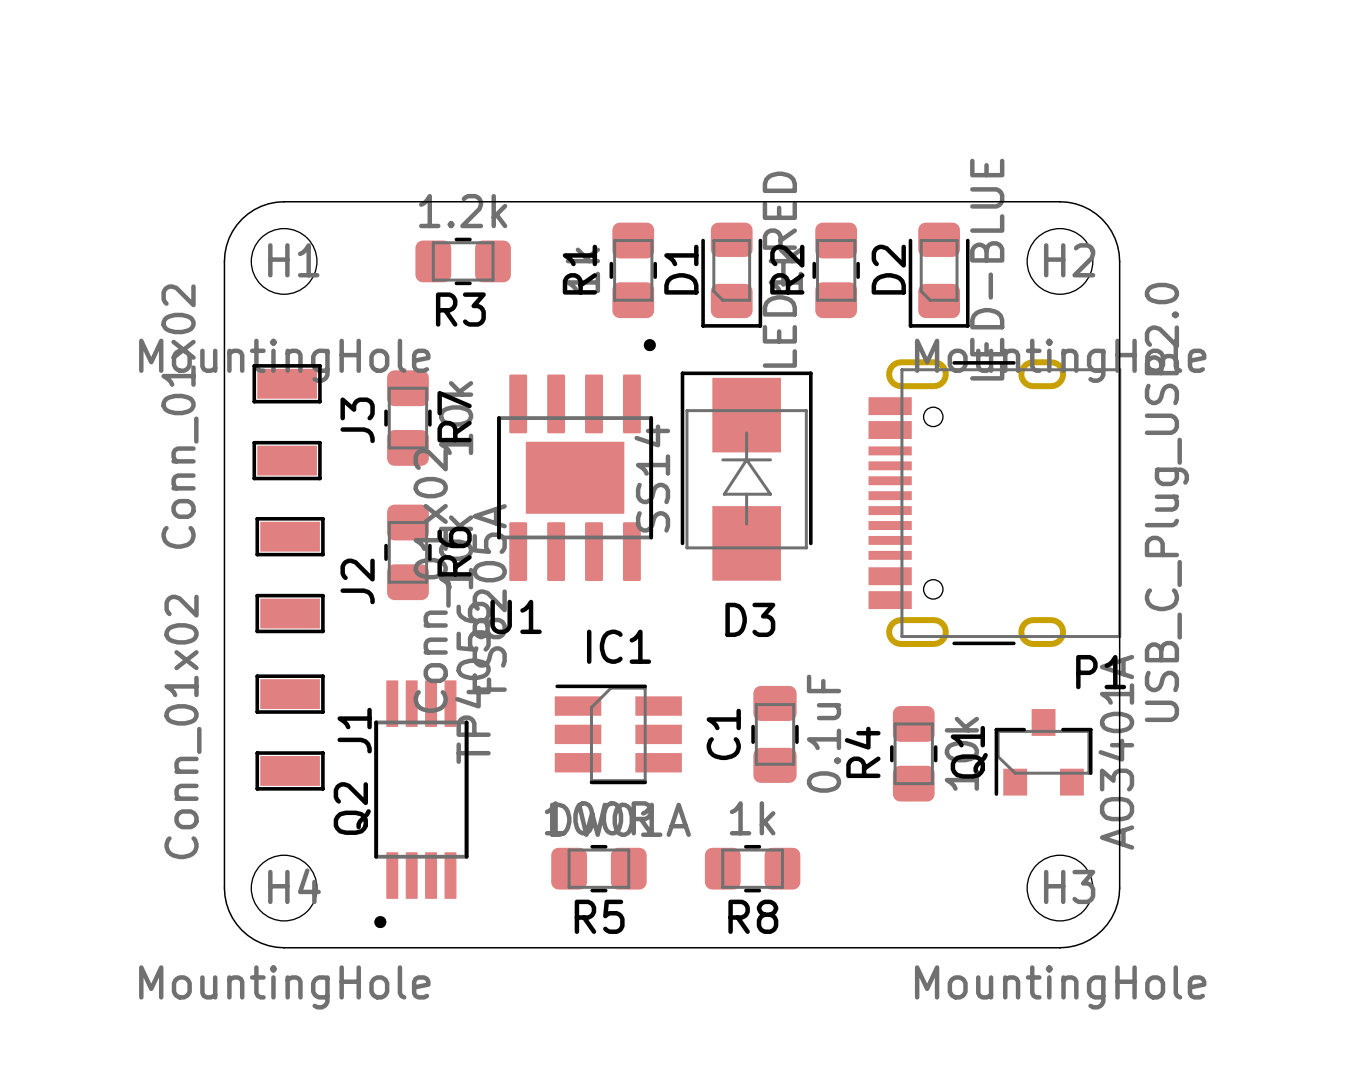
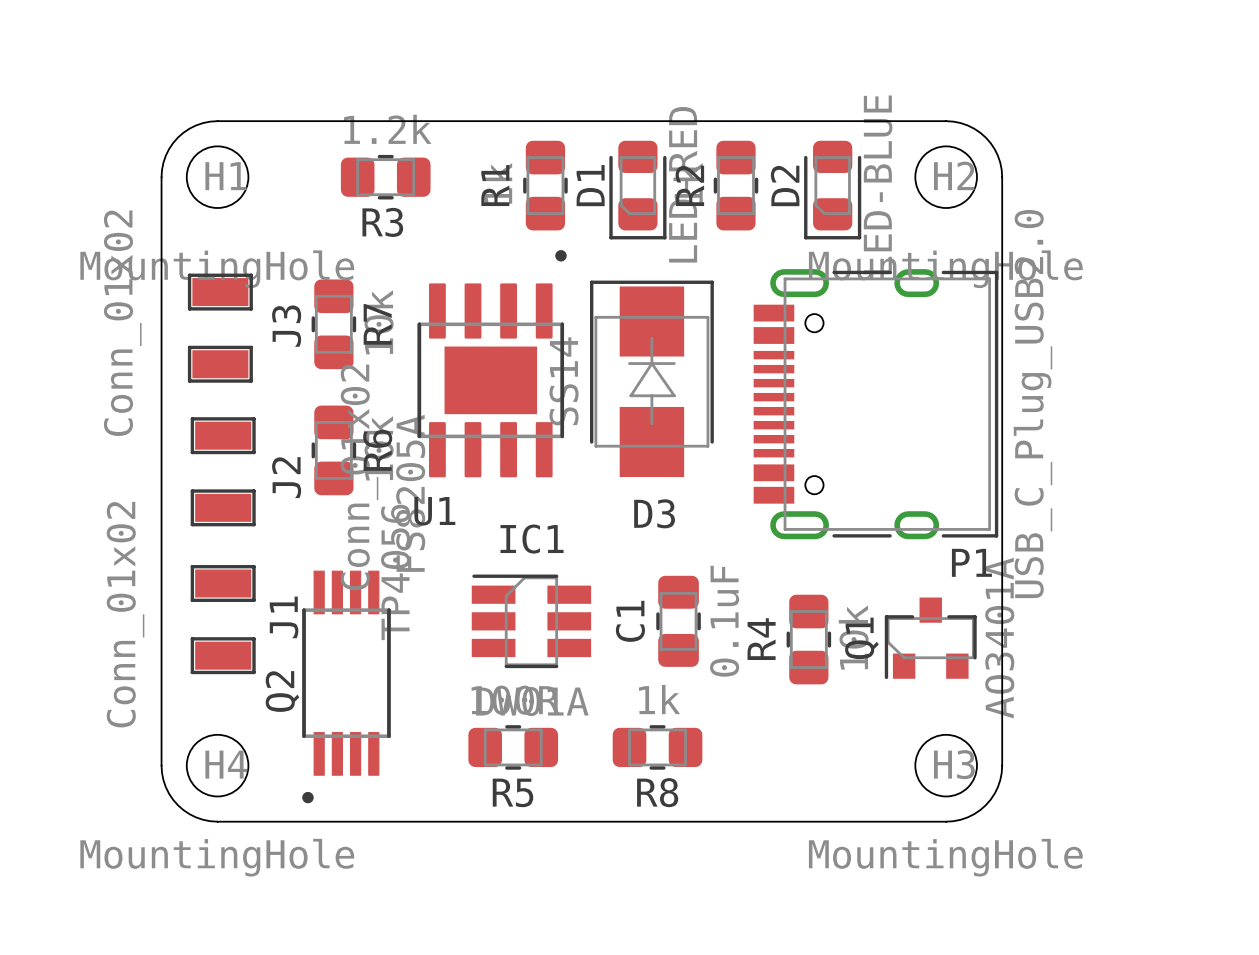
P1 footprint: [868, 359, 1122, 647] -> [753, 269, 999, 540]

